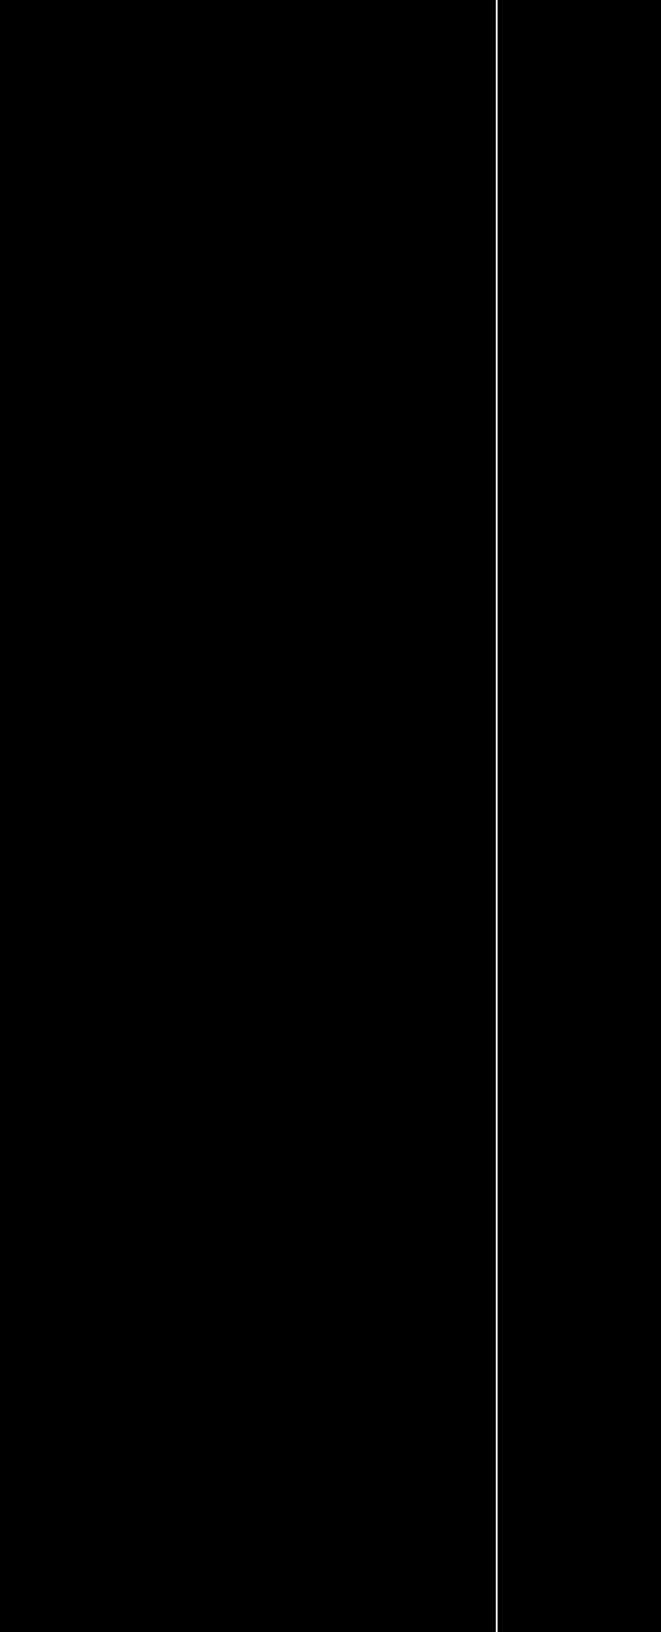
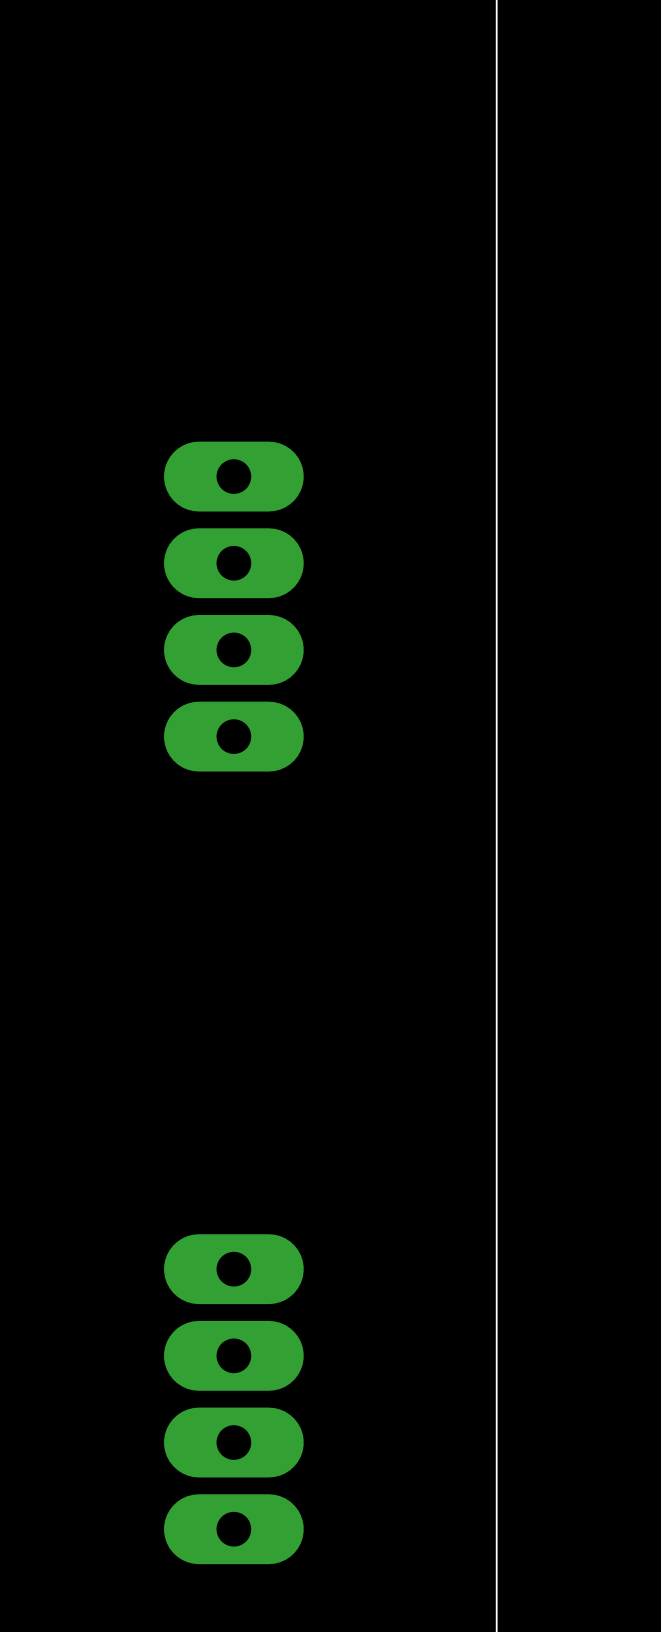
part: none -> (233, 606)
part: none -> (233, 1399)

